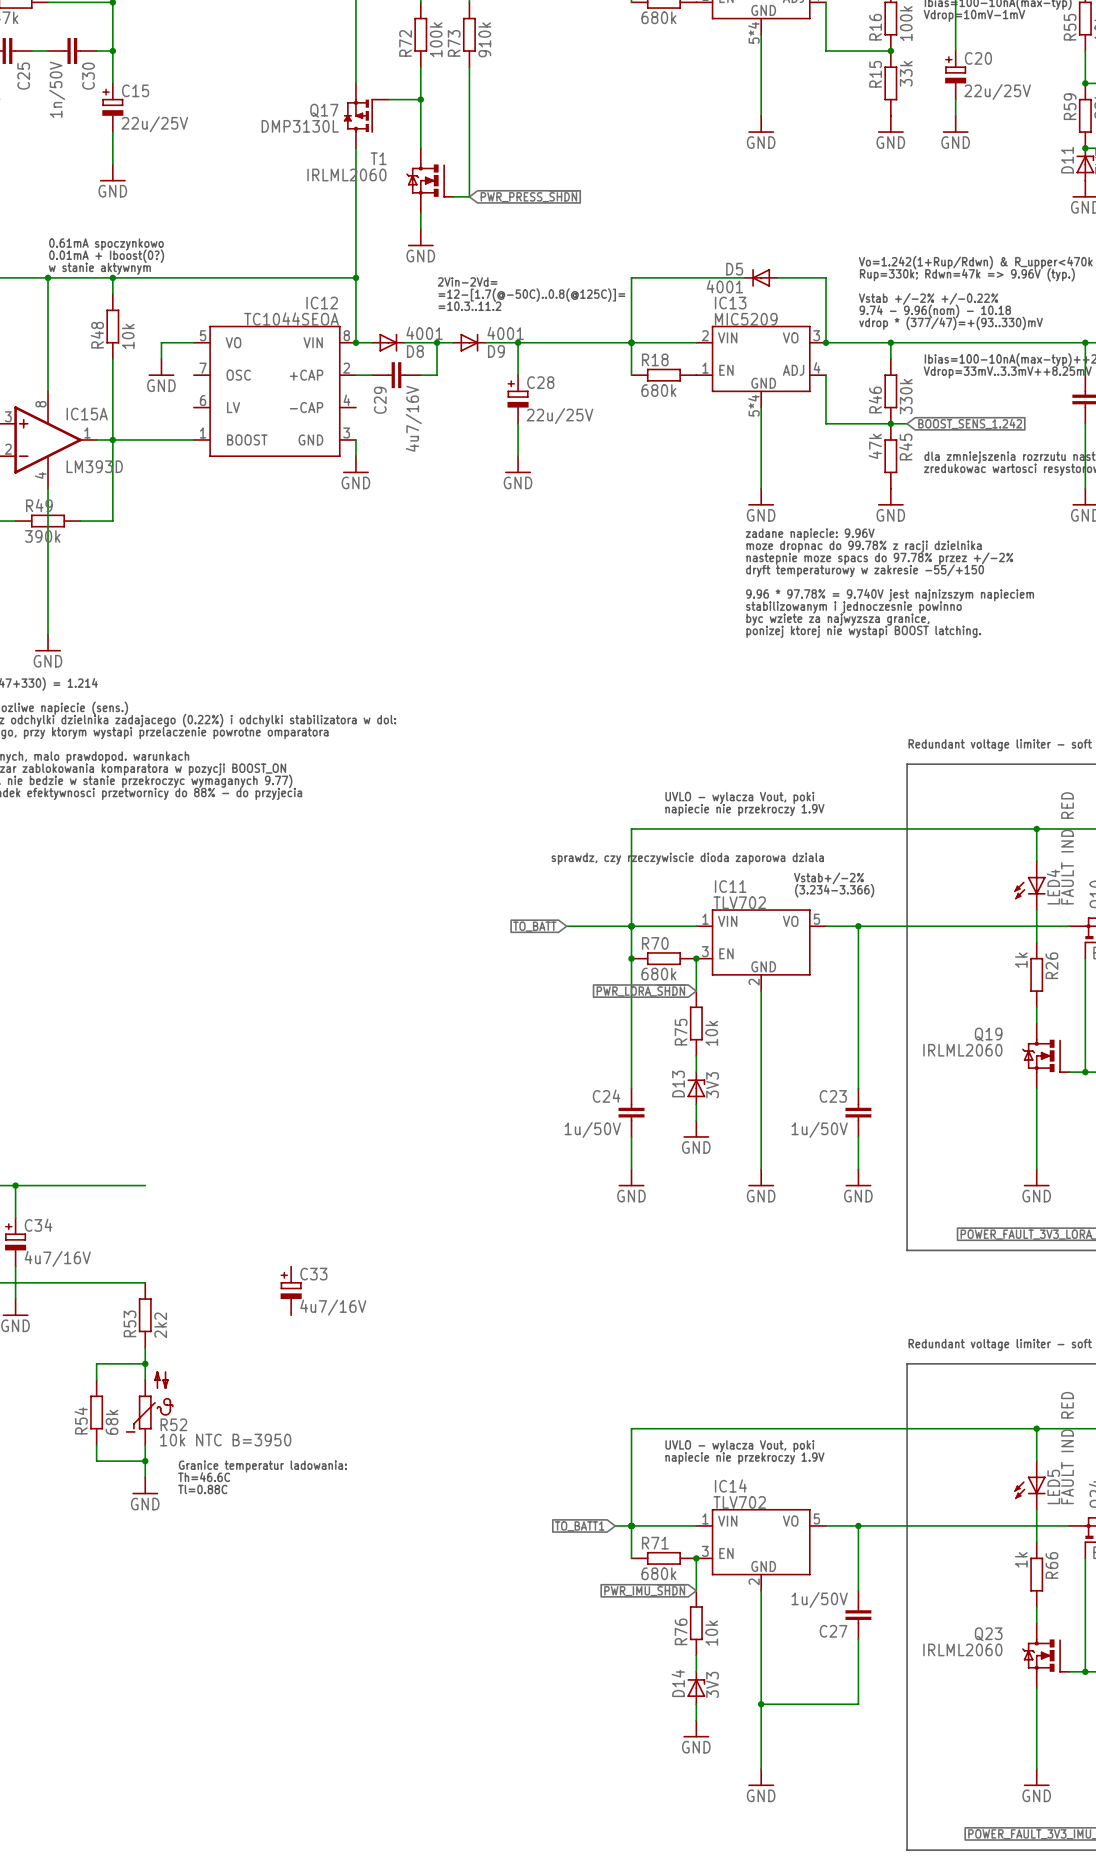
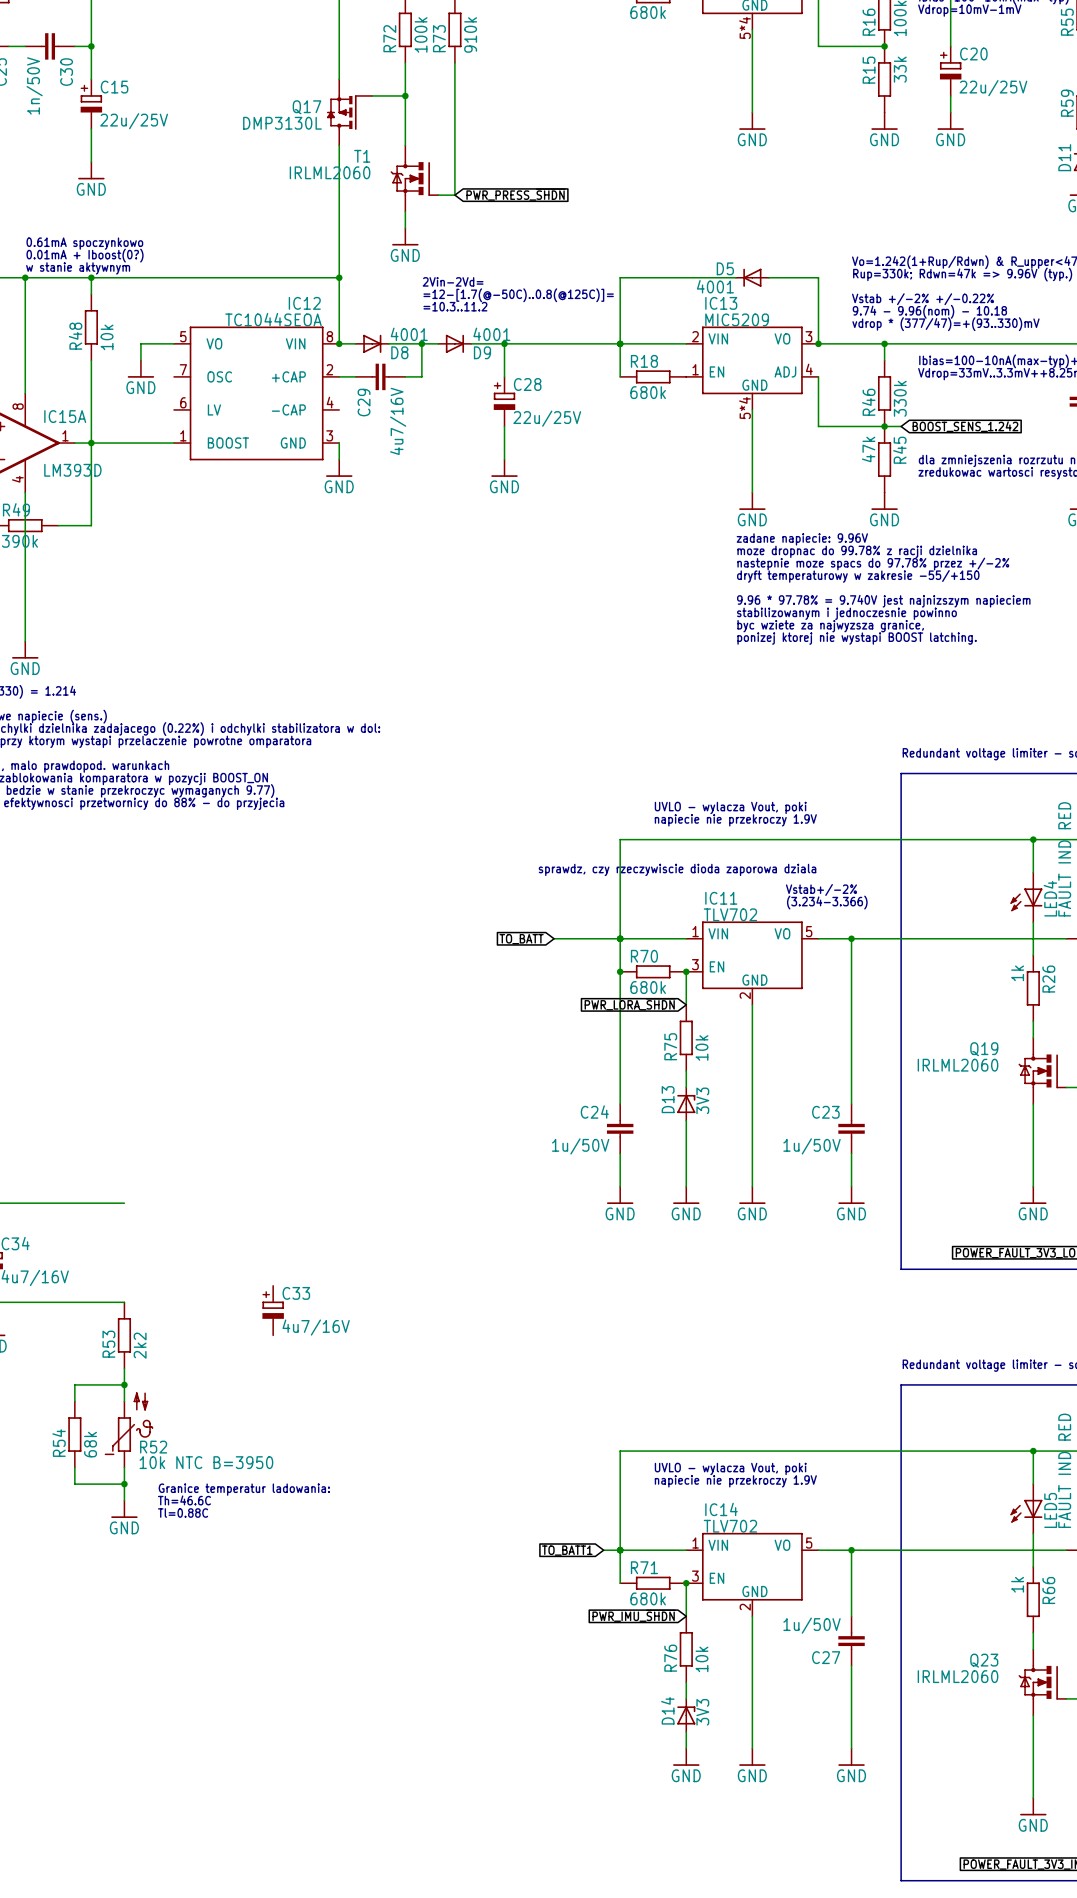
wire: none -> (686, 1137) (686, 1186)
power symbol position: GND (696, 1129) -> GND (686, 1195)
wire: (761, 1704) (858, 1704) -> (851, 1748) (851, 1731)
junction: (761, 1704) -> none
wire: (761, 1720) (761, 1769) -> none
power symbol: none -> GND (851, 1757)
power symbol position: GND (761, 1777) -> GND (752, 1757)

